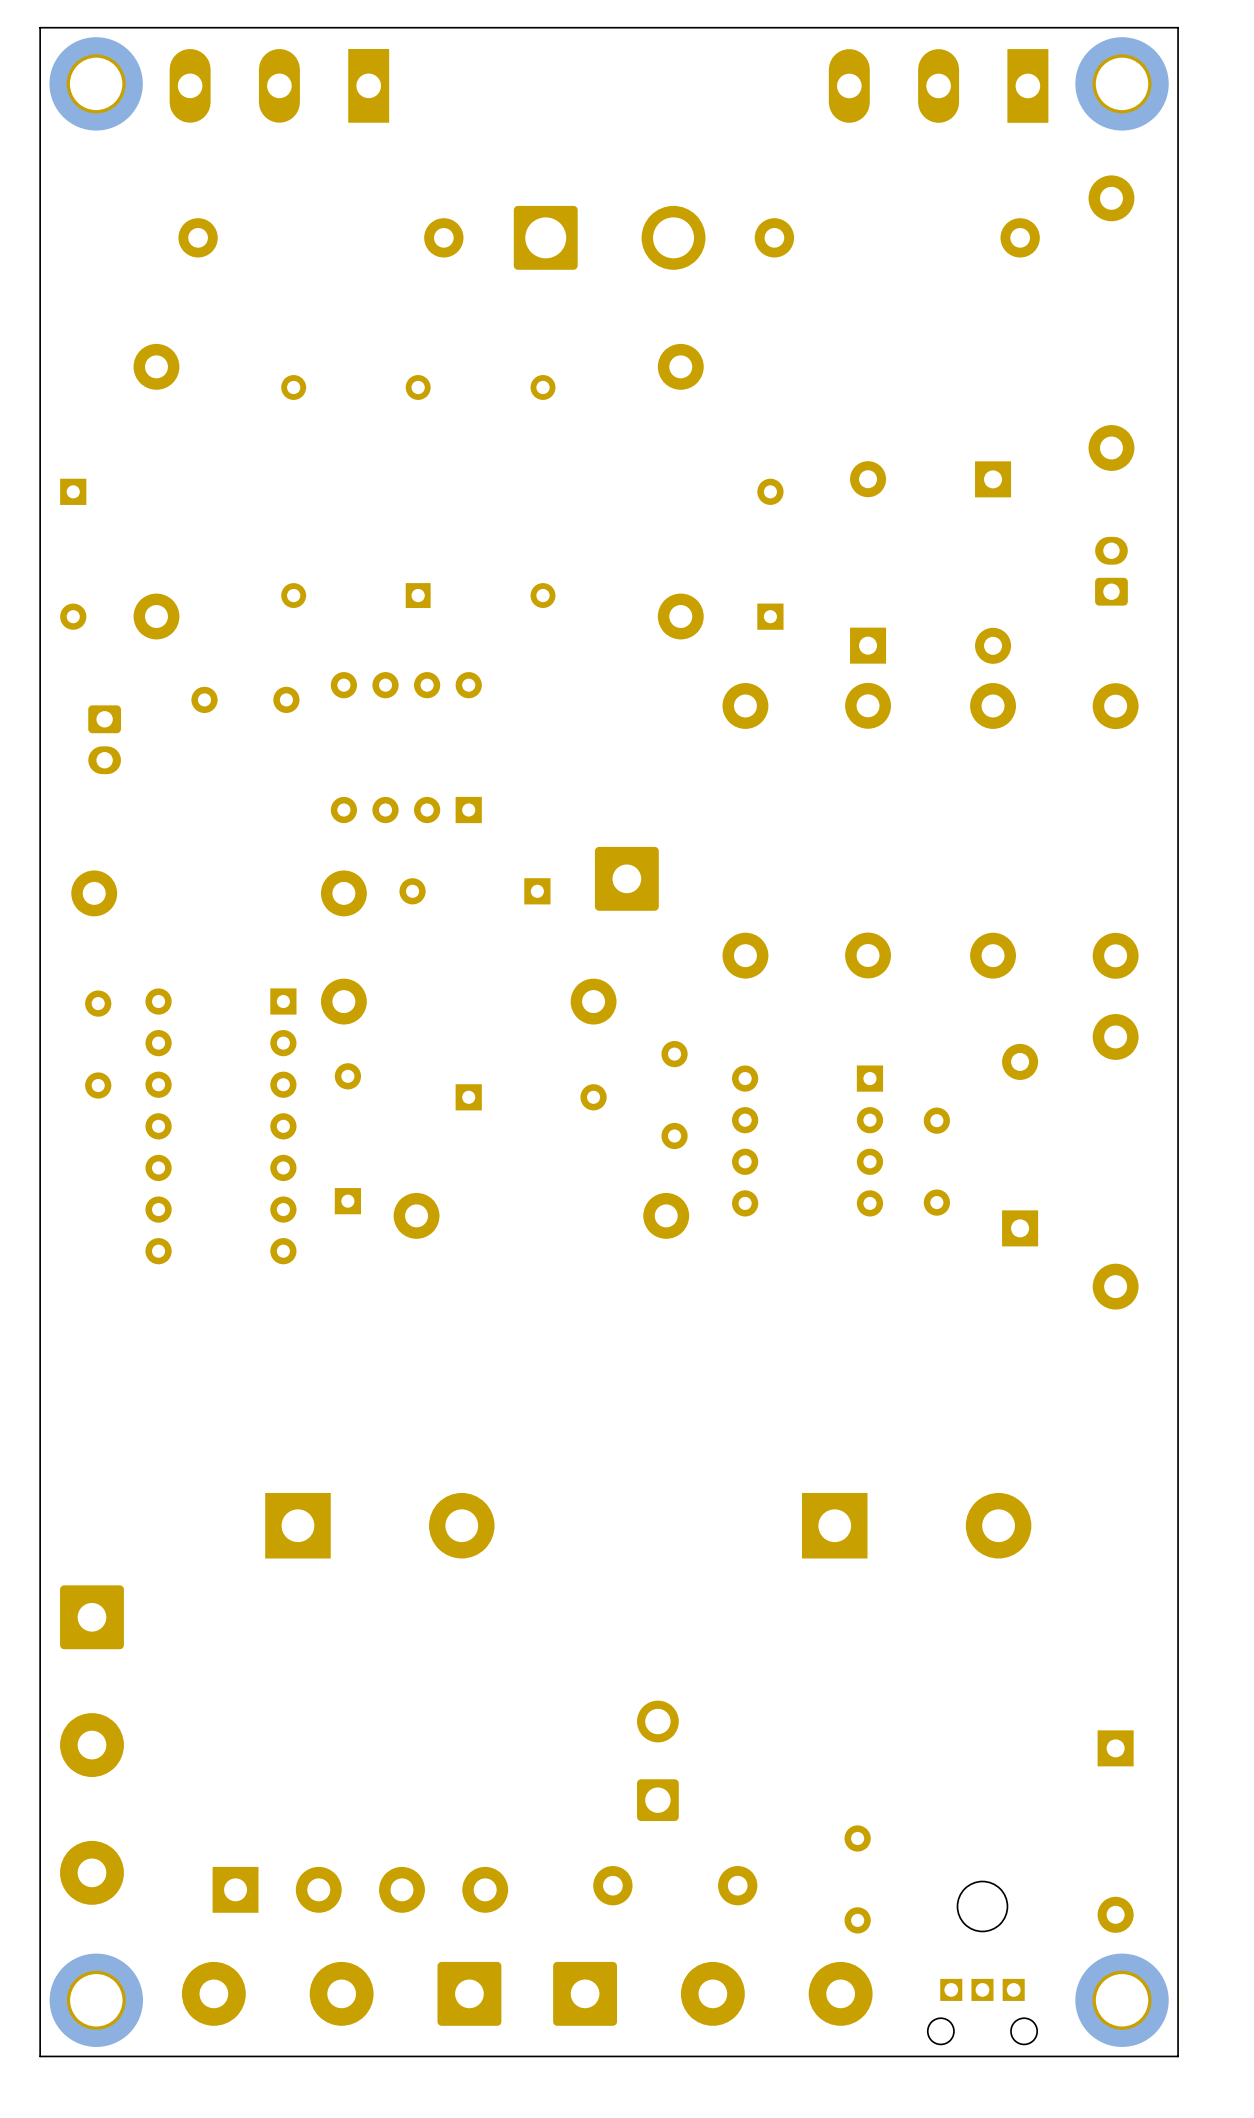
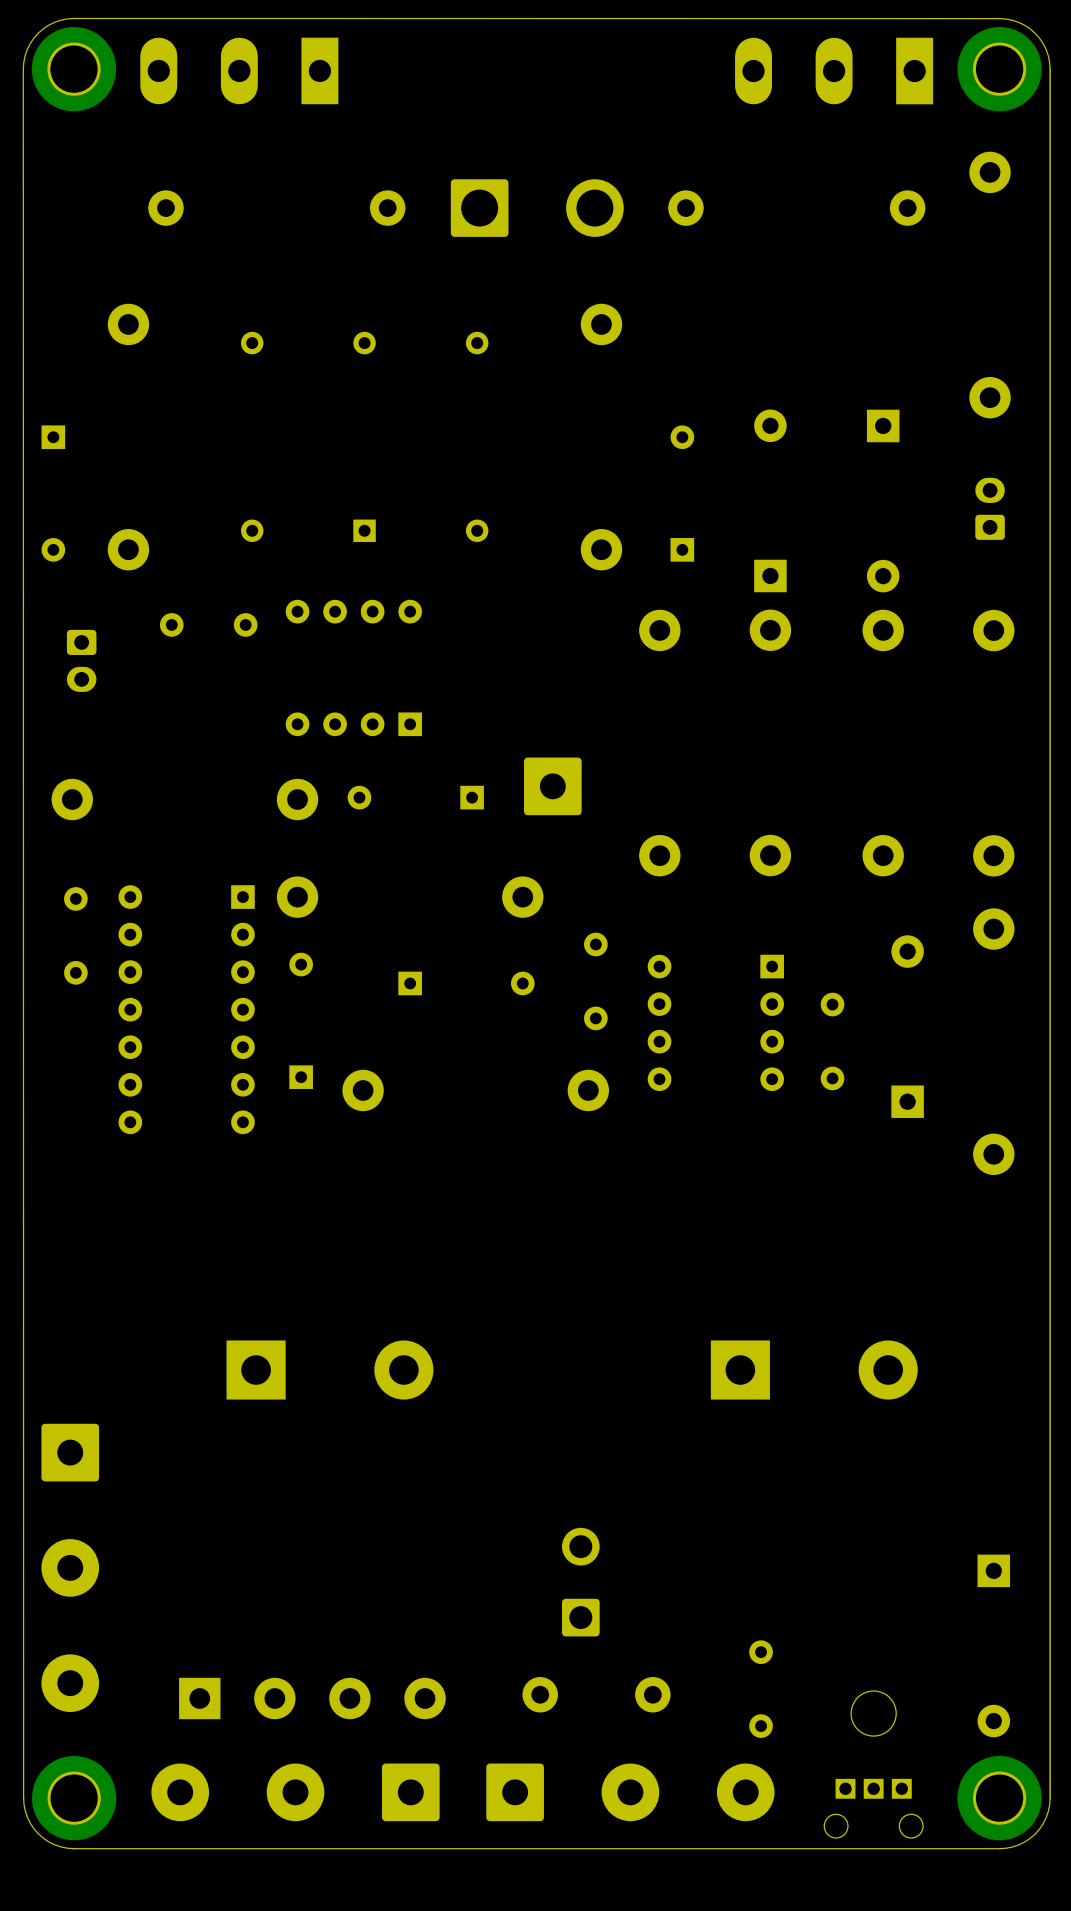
board edge: (1178, 83) (1178, 27) (40, 27) (40, 2056) (1178, 2056) (1178, 2000) -> (1050, 69) (1046, 49) (1035, 33) (1018, 22) (999, 18) (74, 18) (54, 22) (38, 33) (27, 49) (23, 69) (23, 1798) (25, 1811) (30, 1823) (38, 1833) (48, 1841) (60, 1846) (74, 1848) (999, 1848) (1018, 1844) (1035, 1833) (1046, 1817) (1050, 1798)

